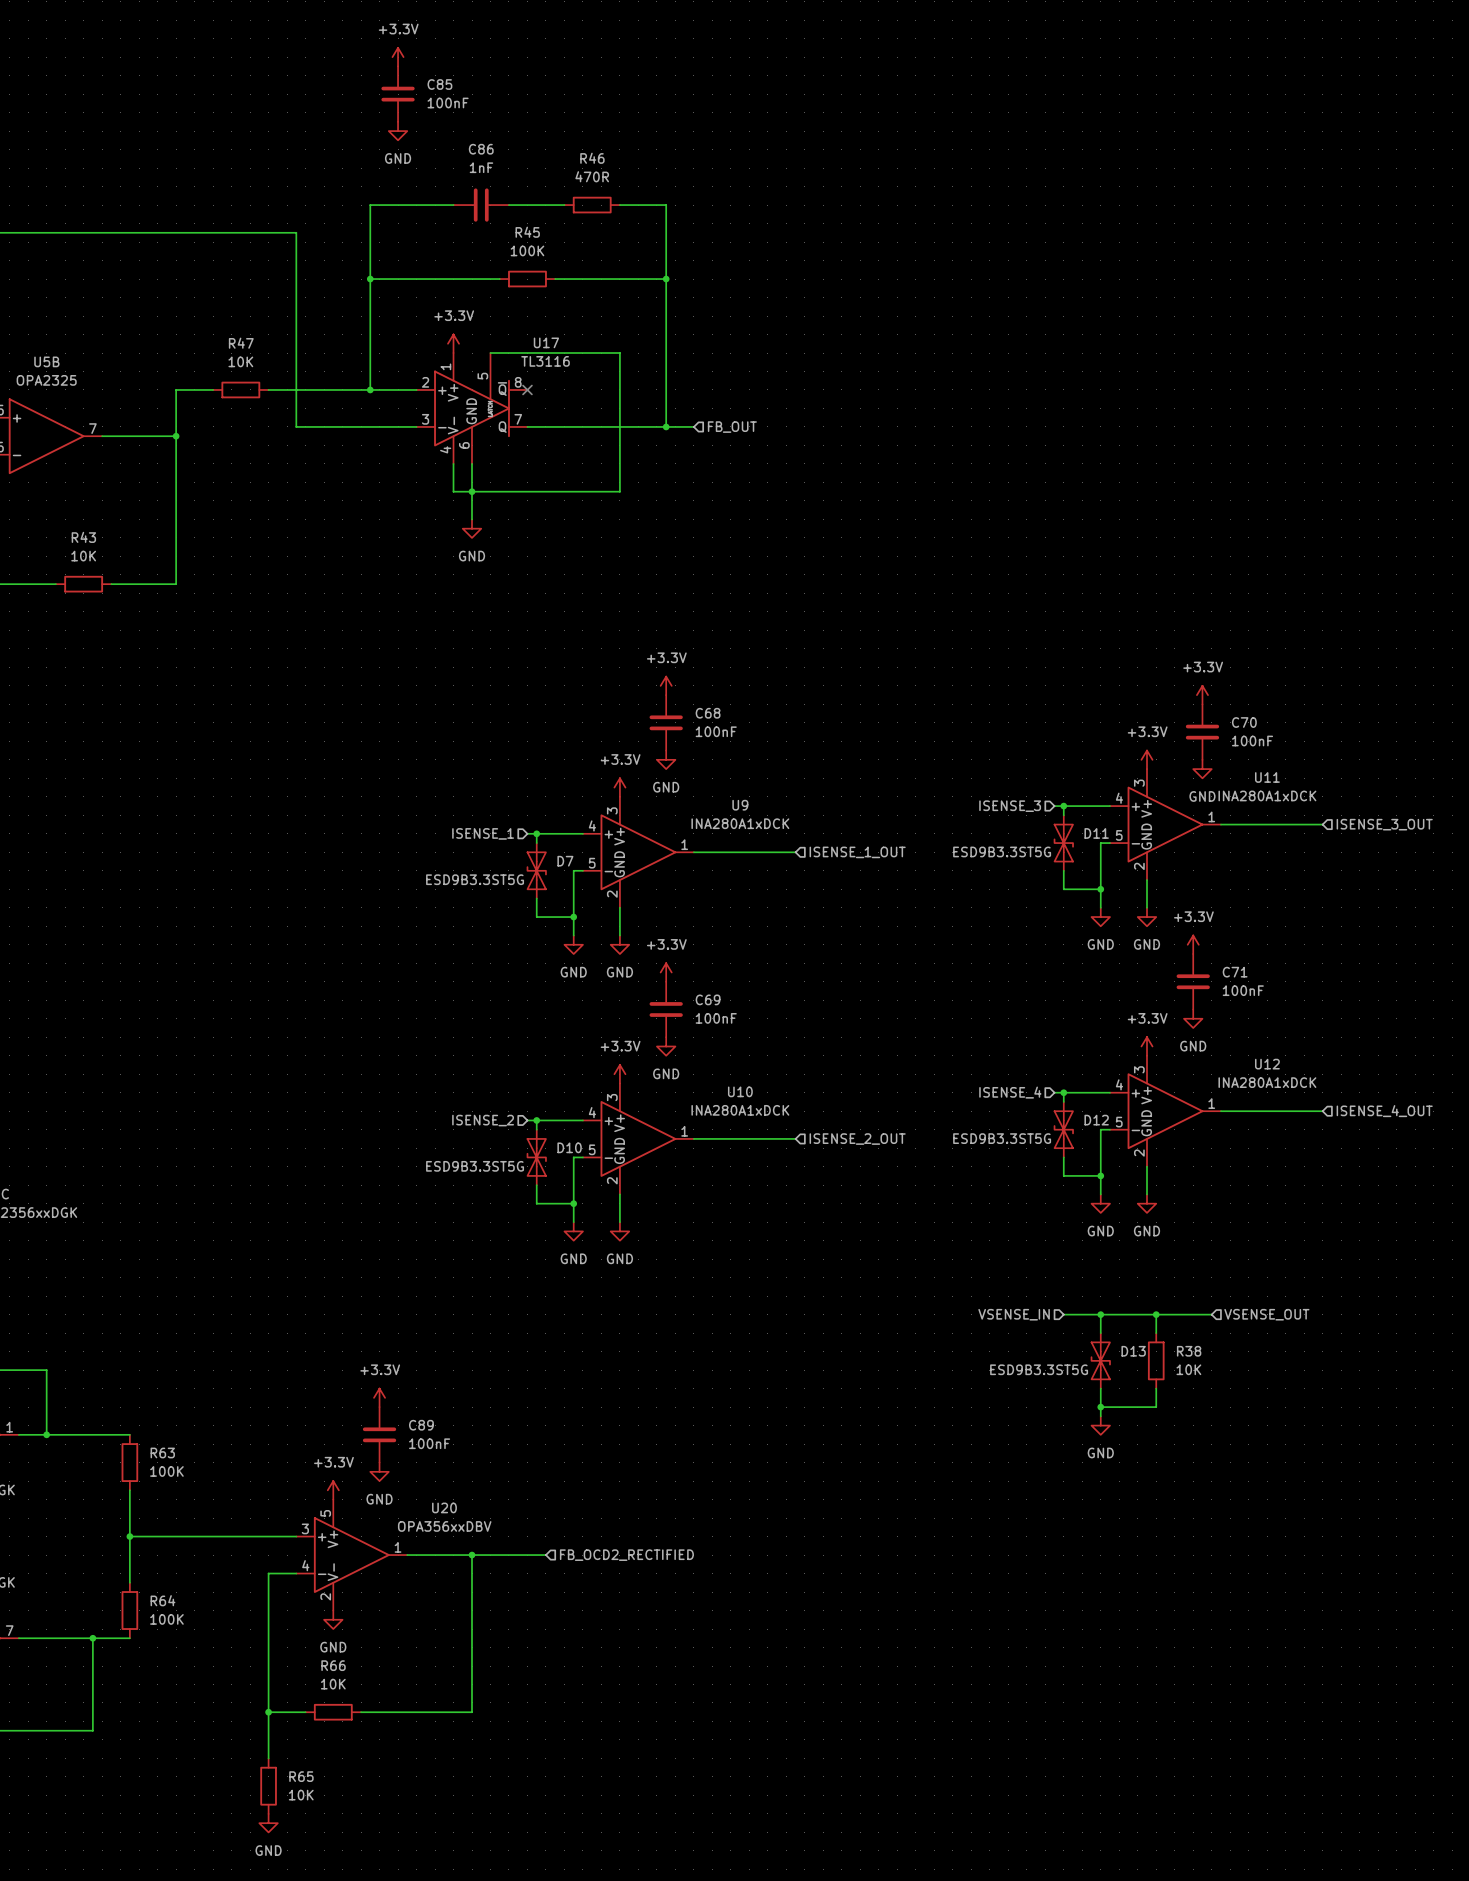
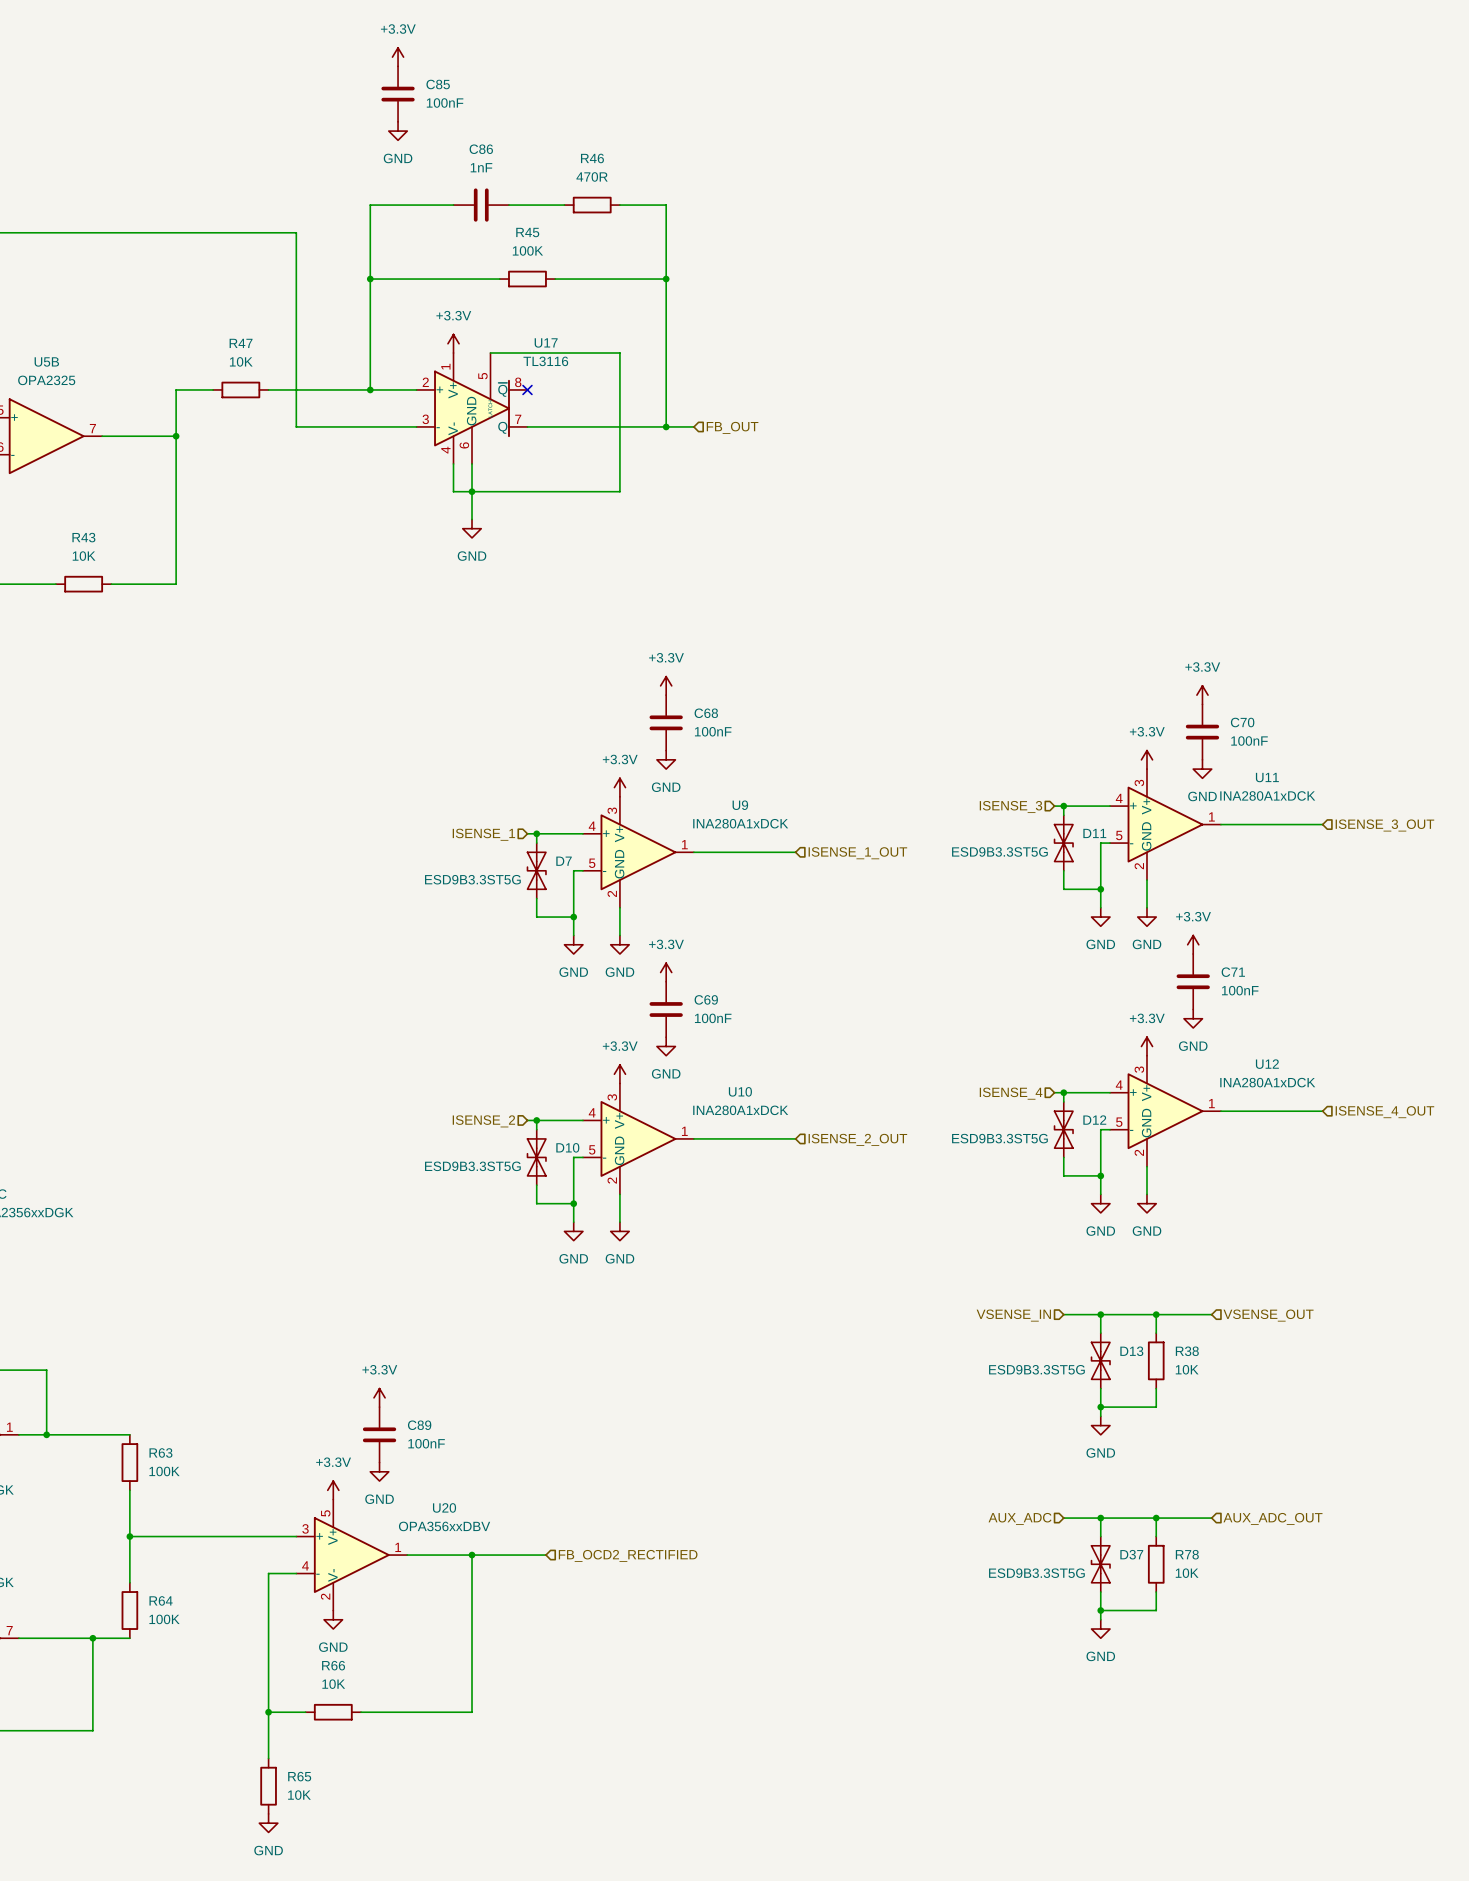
hierarchical label: none -> AUX_ADC (1020, 1518)
wire: none -> (1063, 1518) (1211, 1518)
wire: none -> (1100, 1518) (1100, 1536)
junction: none -> (1100, 1518)
wire: none -> (1156, 1518) (1156, 1536)
junction: none -> (1156, 1518)
hierarchical label: none -> AUX_ADC_OUT (1272, 1518)
D37: none -> ESD9B3.3ST5G (1100, 1564)
R78: none -> 10K (1156, 1564)
wire: none -> (1100, 1592) (1100, 1619)
wire: none -> (1156, 1592) (1156, 1610) (1100, 1610)
junction: none -> (1100, 1610)
power symbol: none -> GND (1100, 1629)

